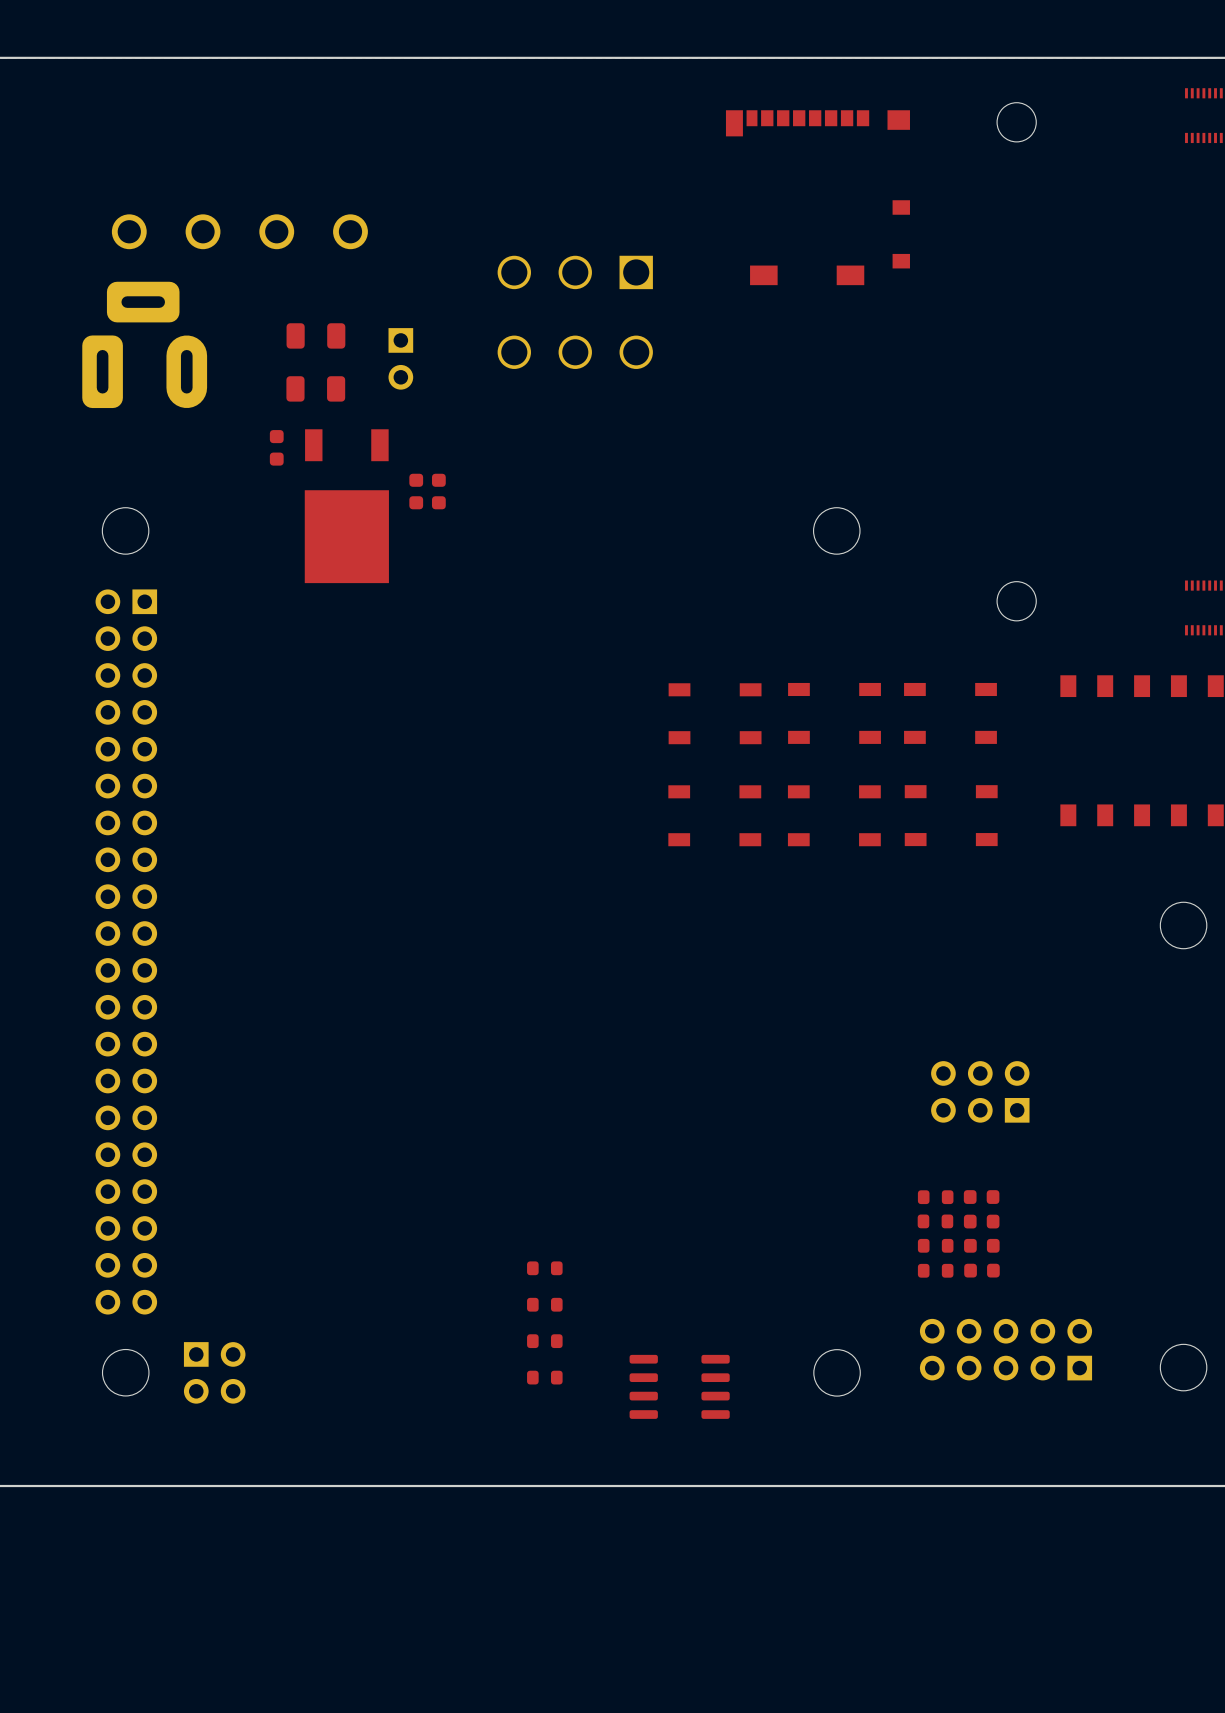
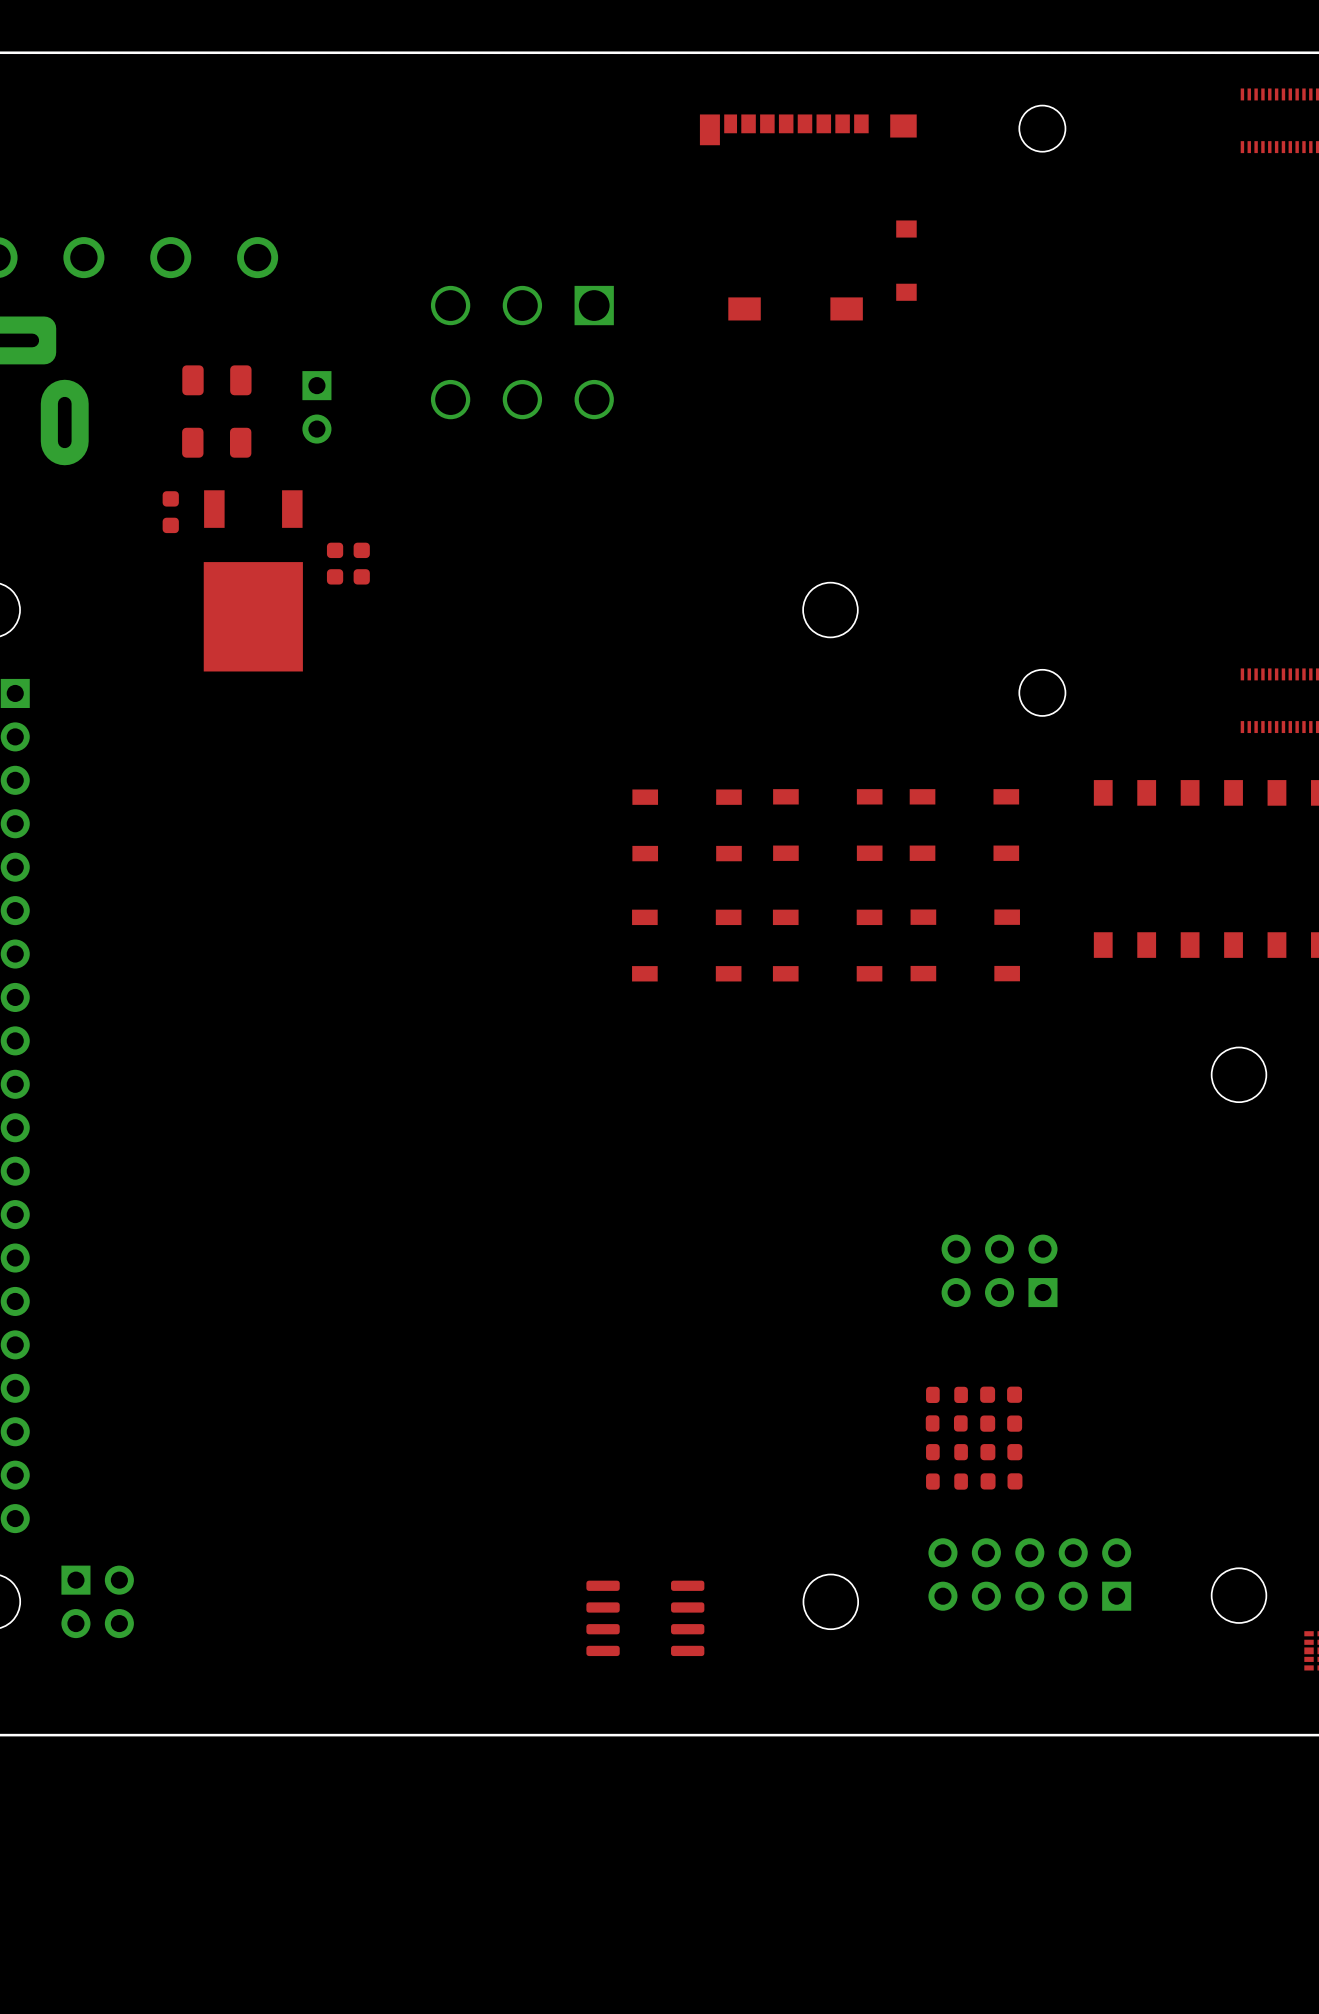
part: (544, 1268) -> none
part: (544, 1304) -> none
part: (544, 1341) -> none
part: (544, 1377) -> none

